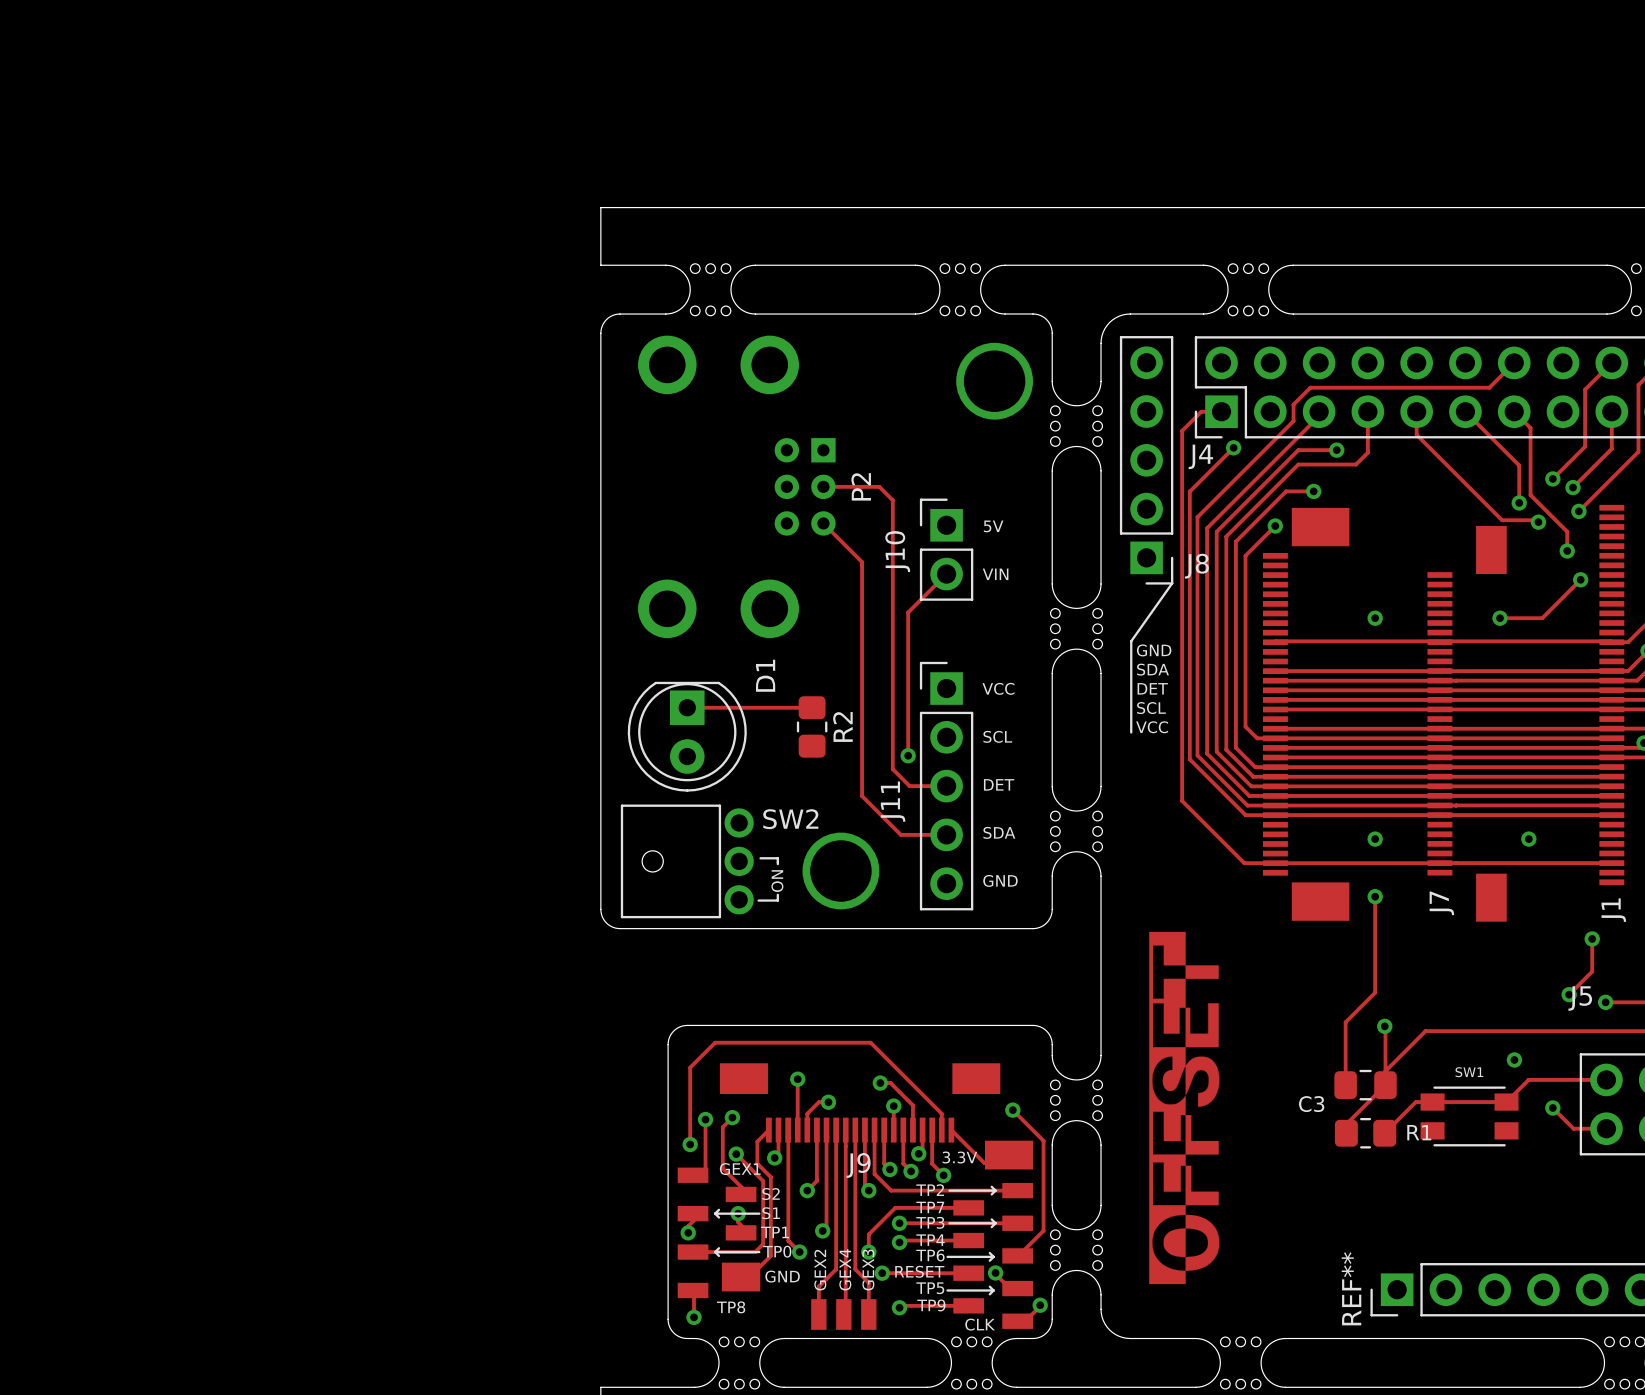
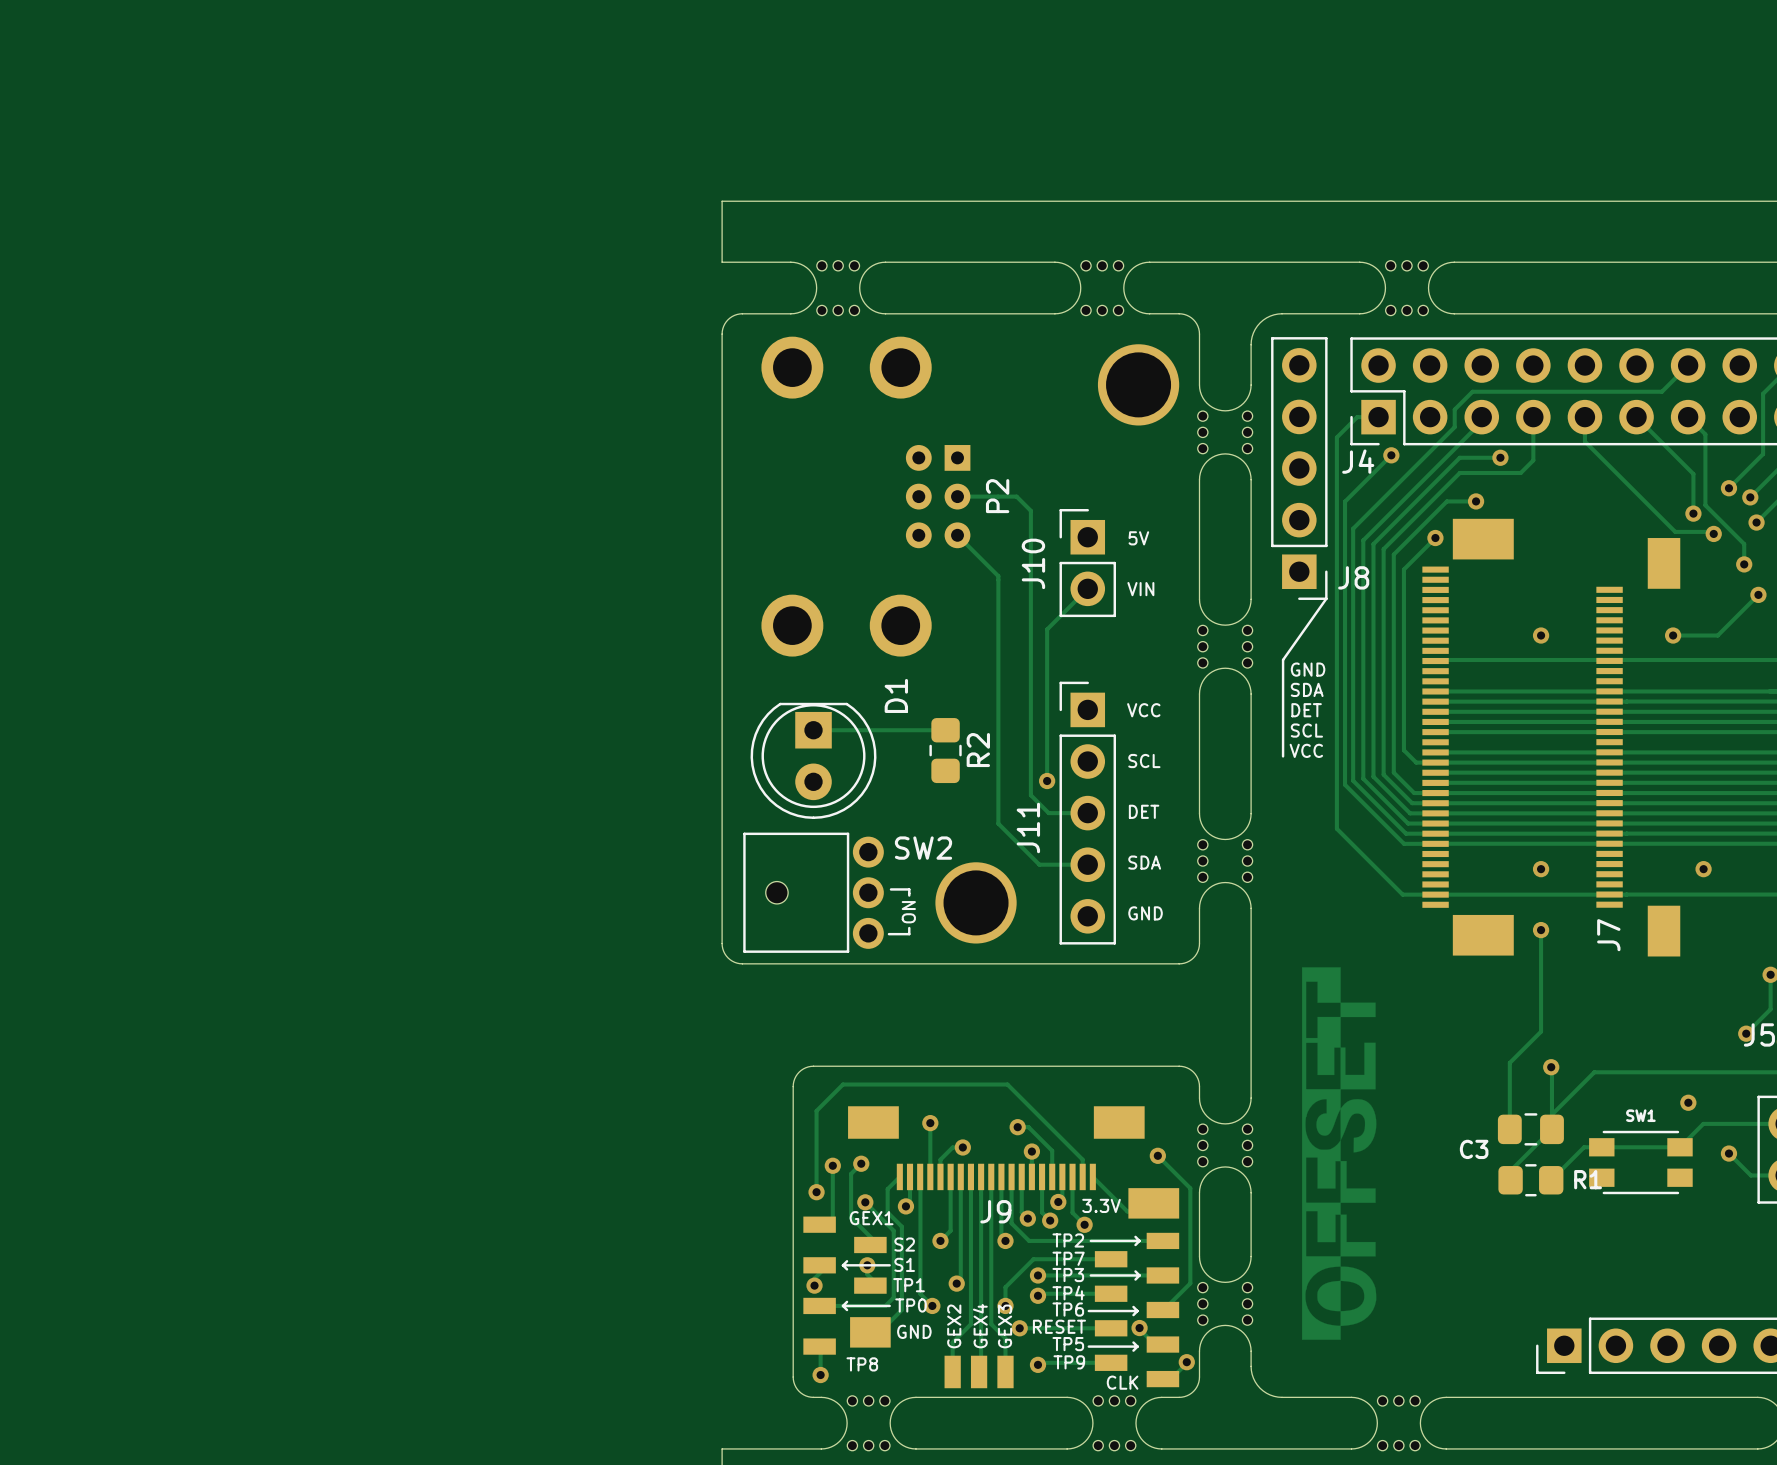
REF** name: REF** (1351, 1288) -> none

